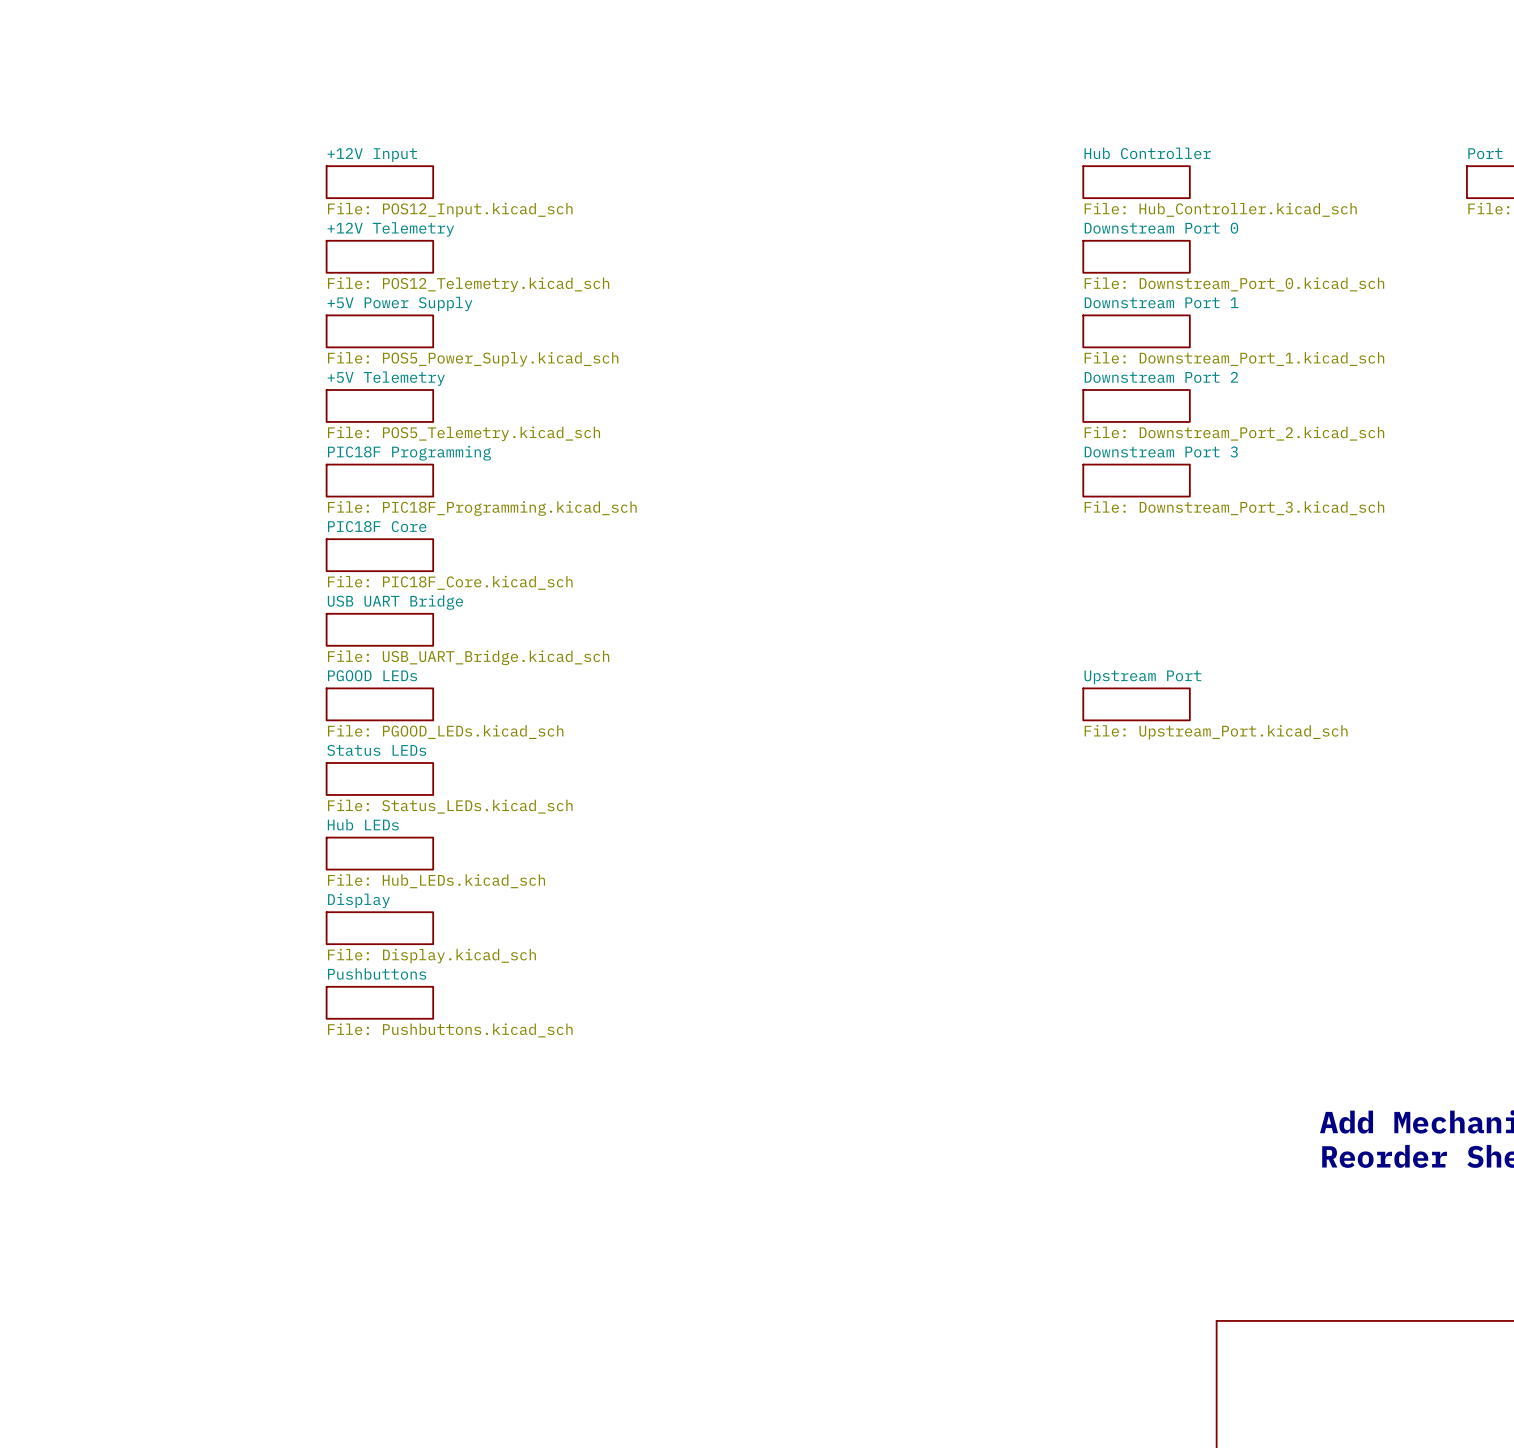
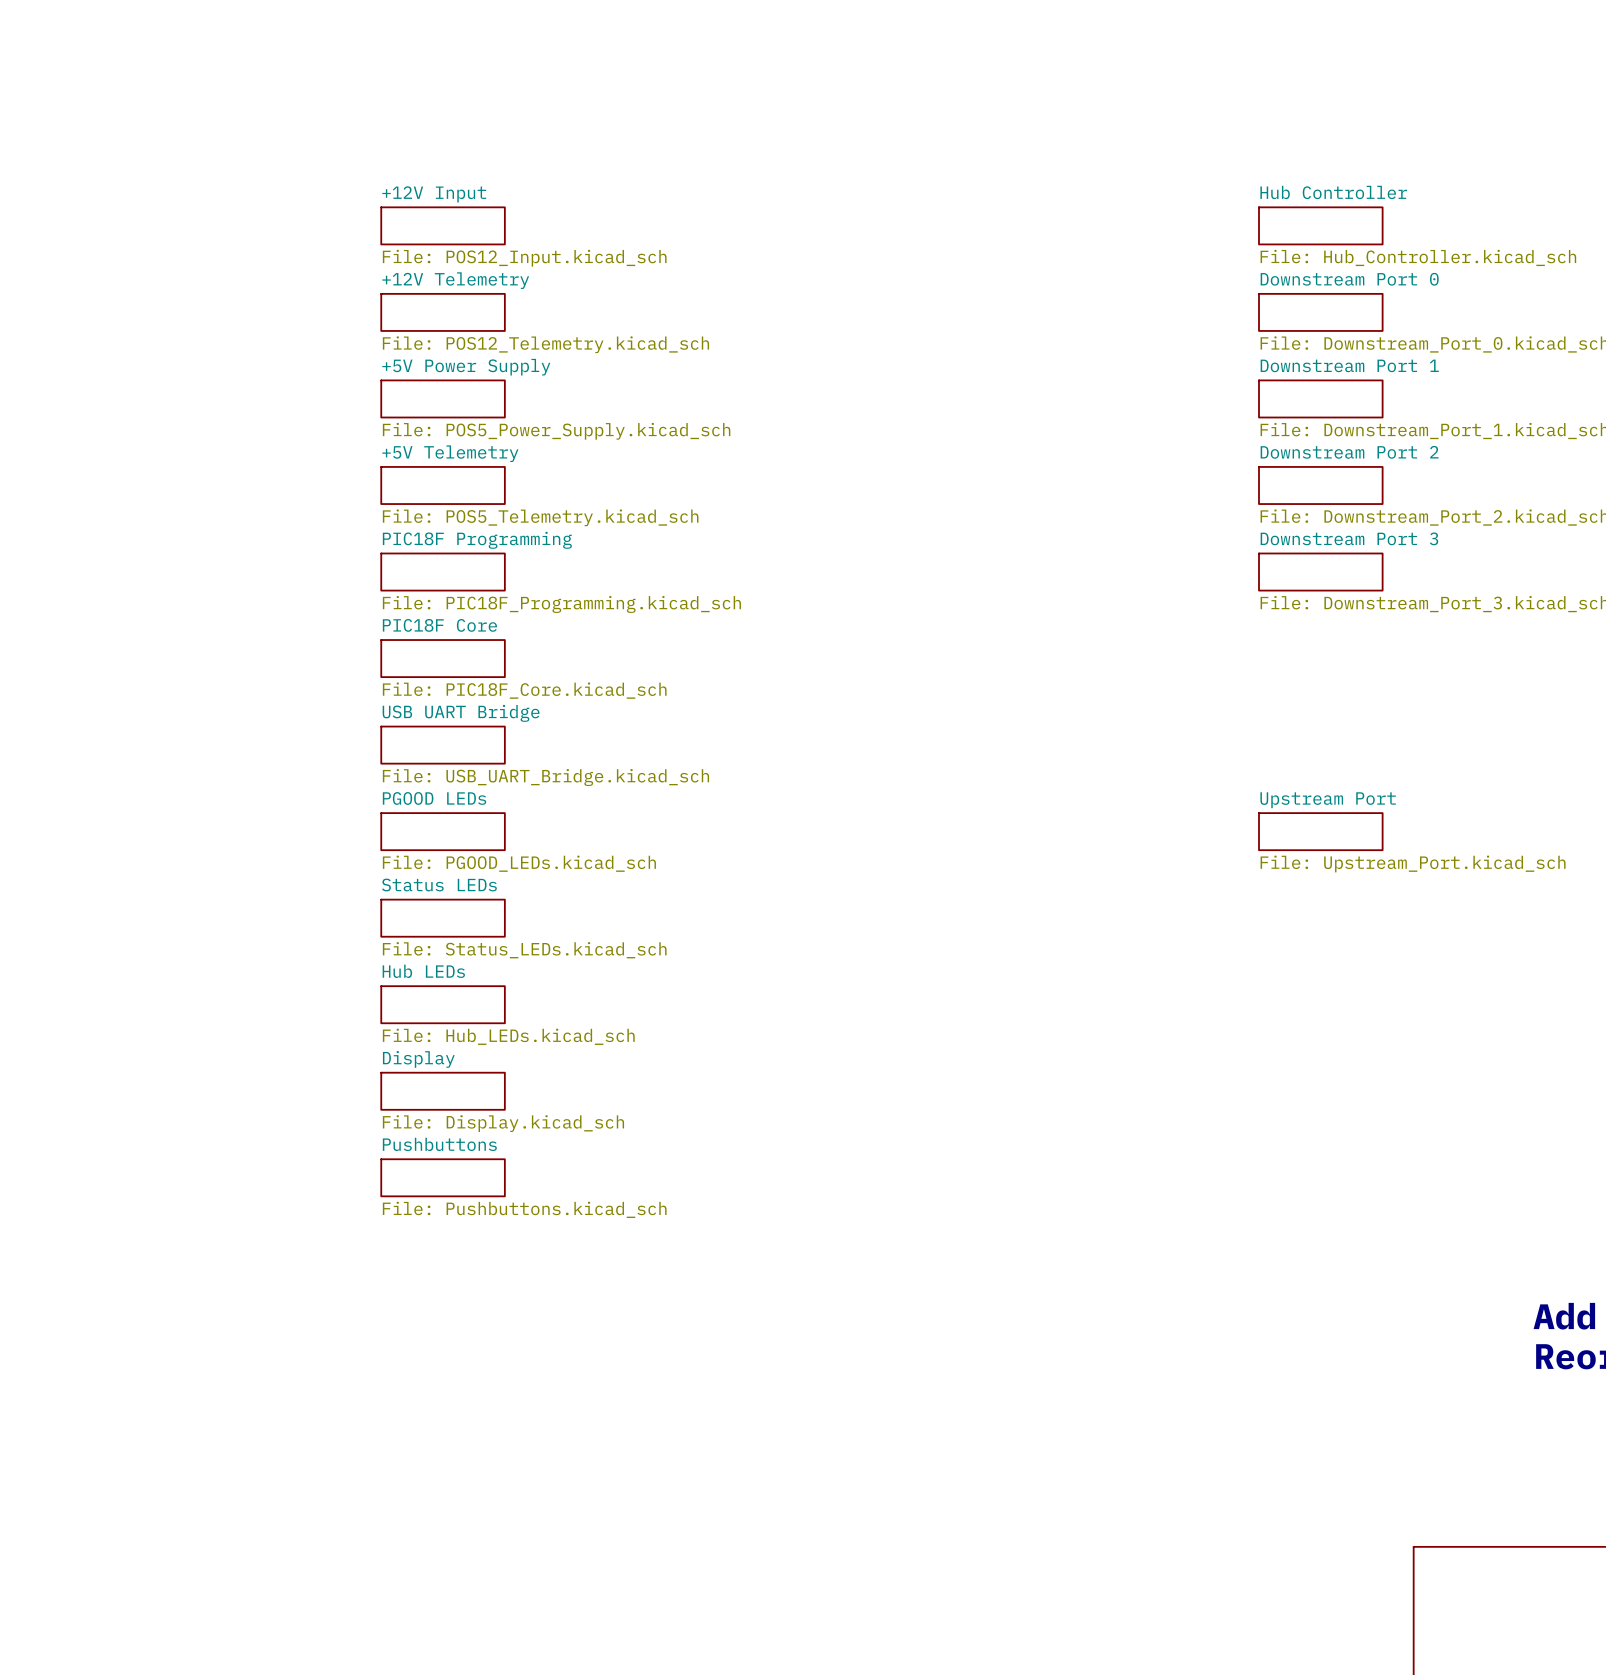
sheet +5V Power Supply value: File: POS5_Power_Suply.kicad_sch (473, 359) -> File: POS5_Power_Supply.kicad_sch (556, 431)

